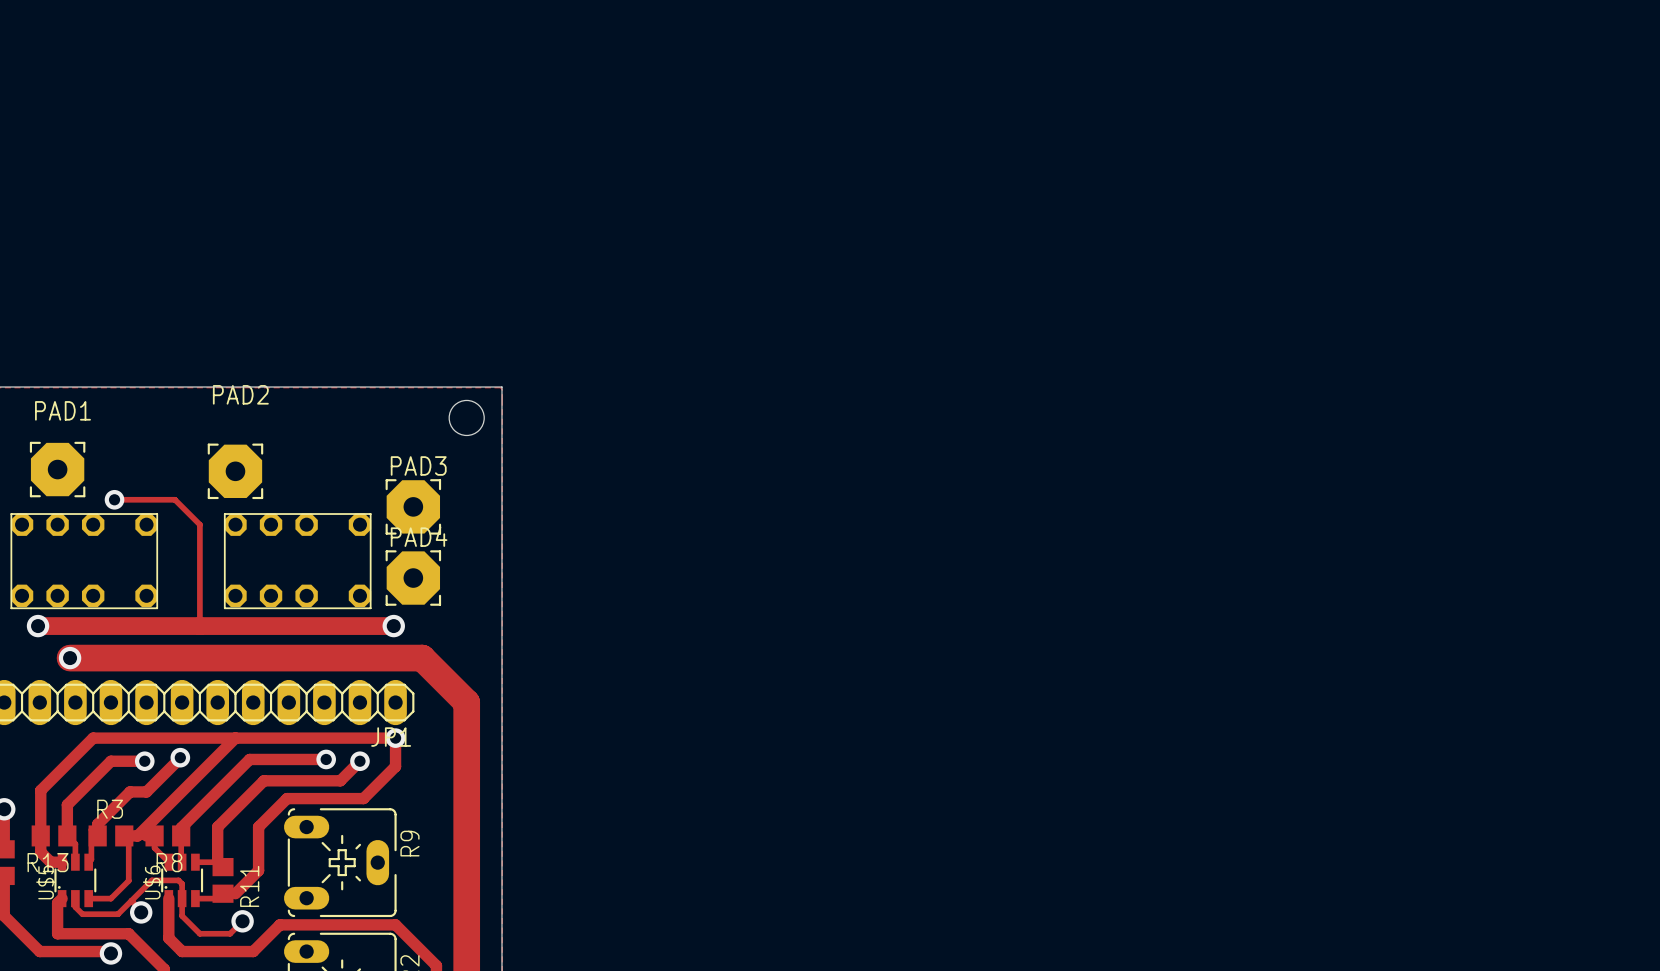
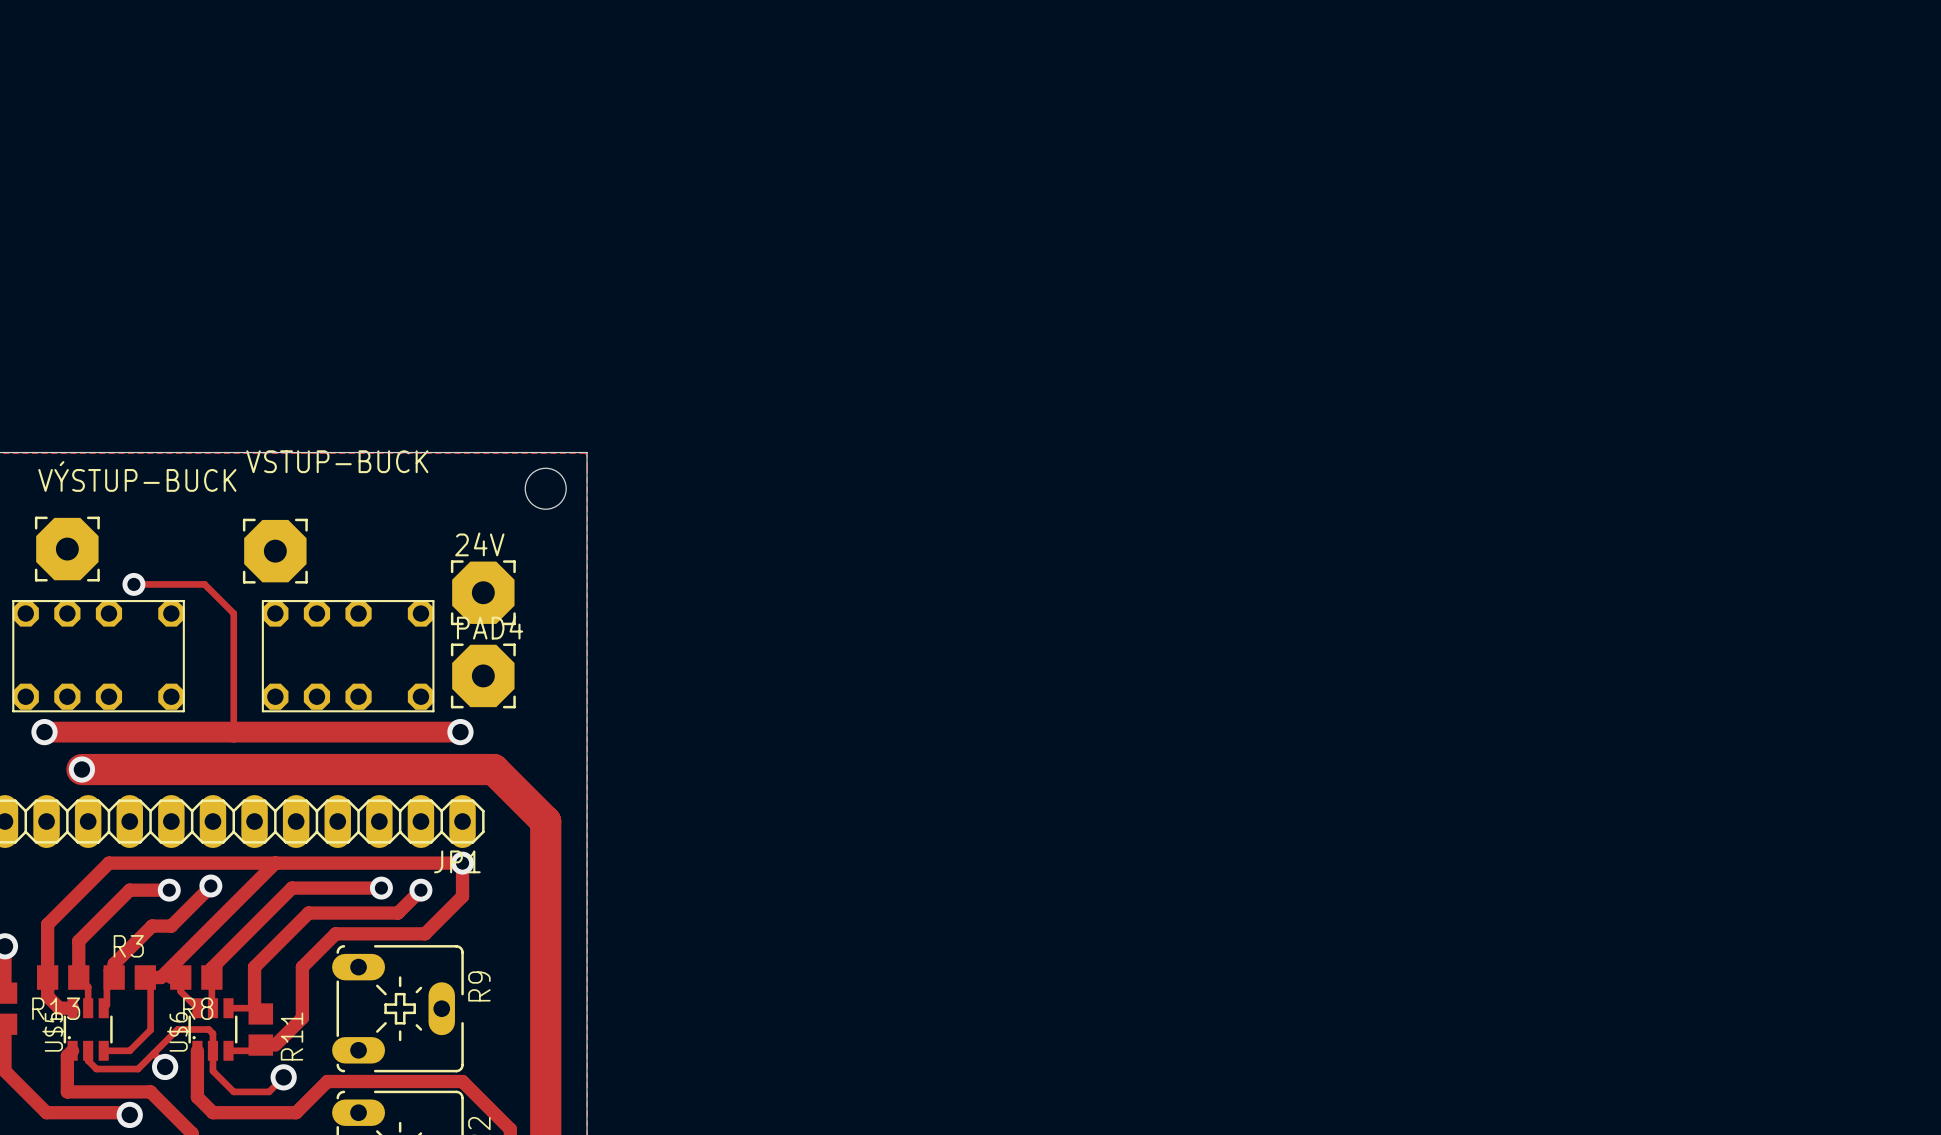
PAD2 name: PAD2 (240, 394) -> VSTUP-BUCK (337, 461)
PAD1 name: PAD1 (62, 410) -> VÝSTUP-BUCK (137, 476)
PAD3 name: PAD3 (418, 465) -> 24V (479, 544)

